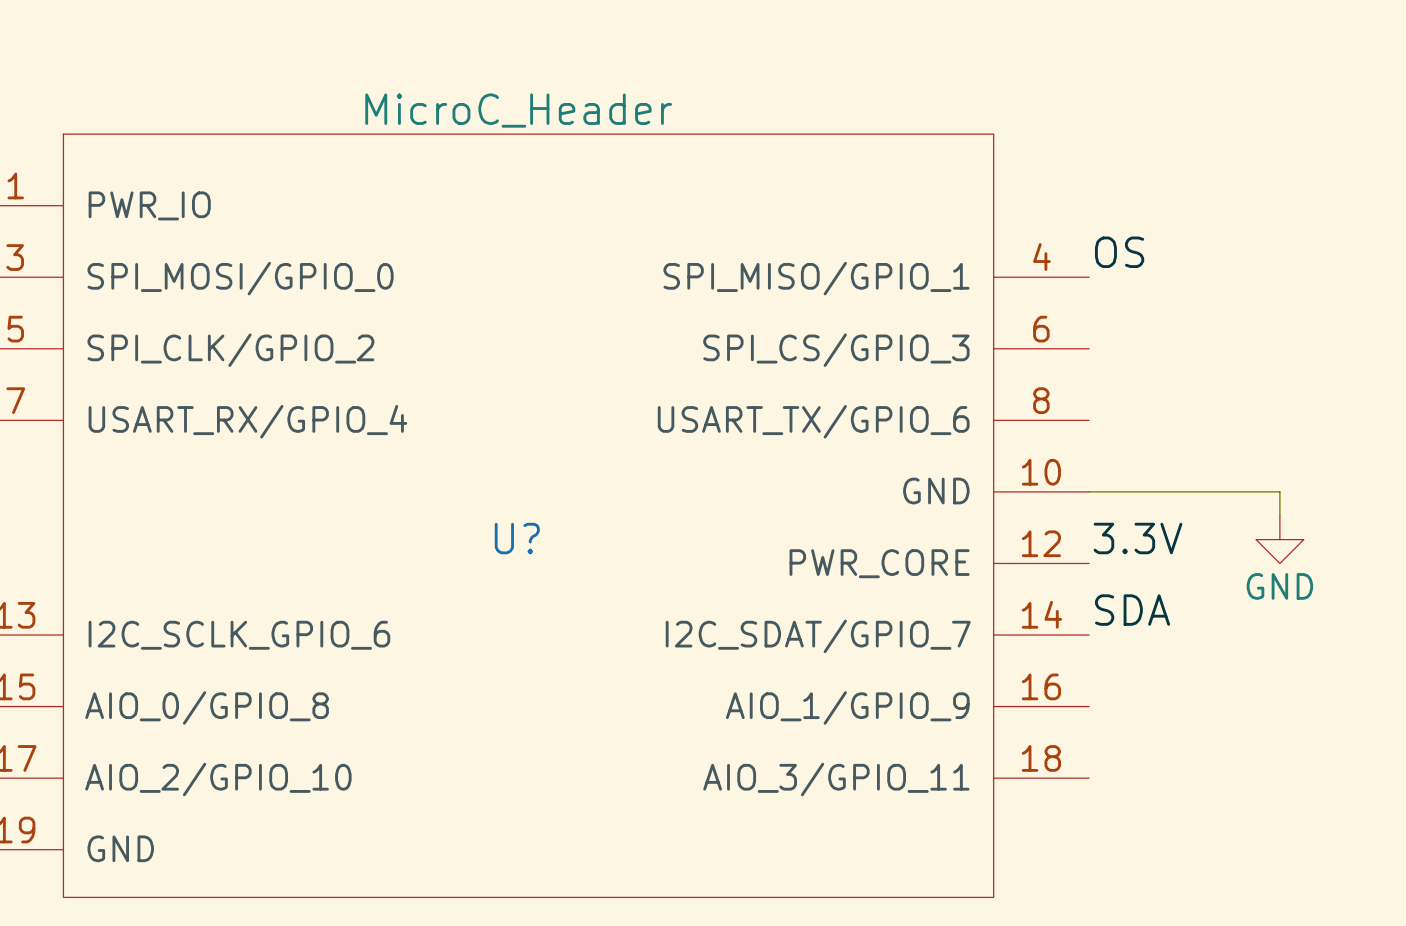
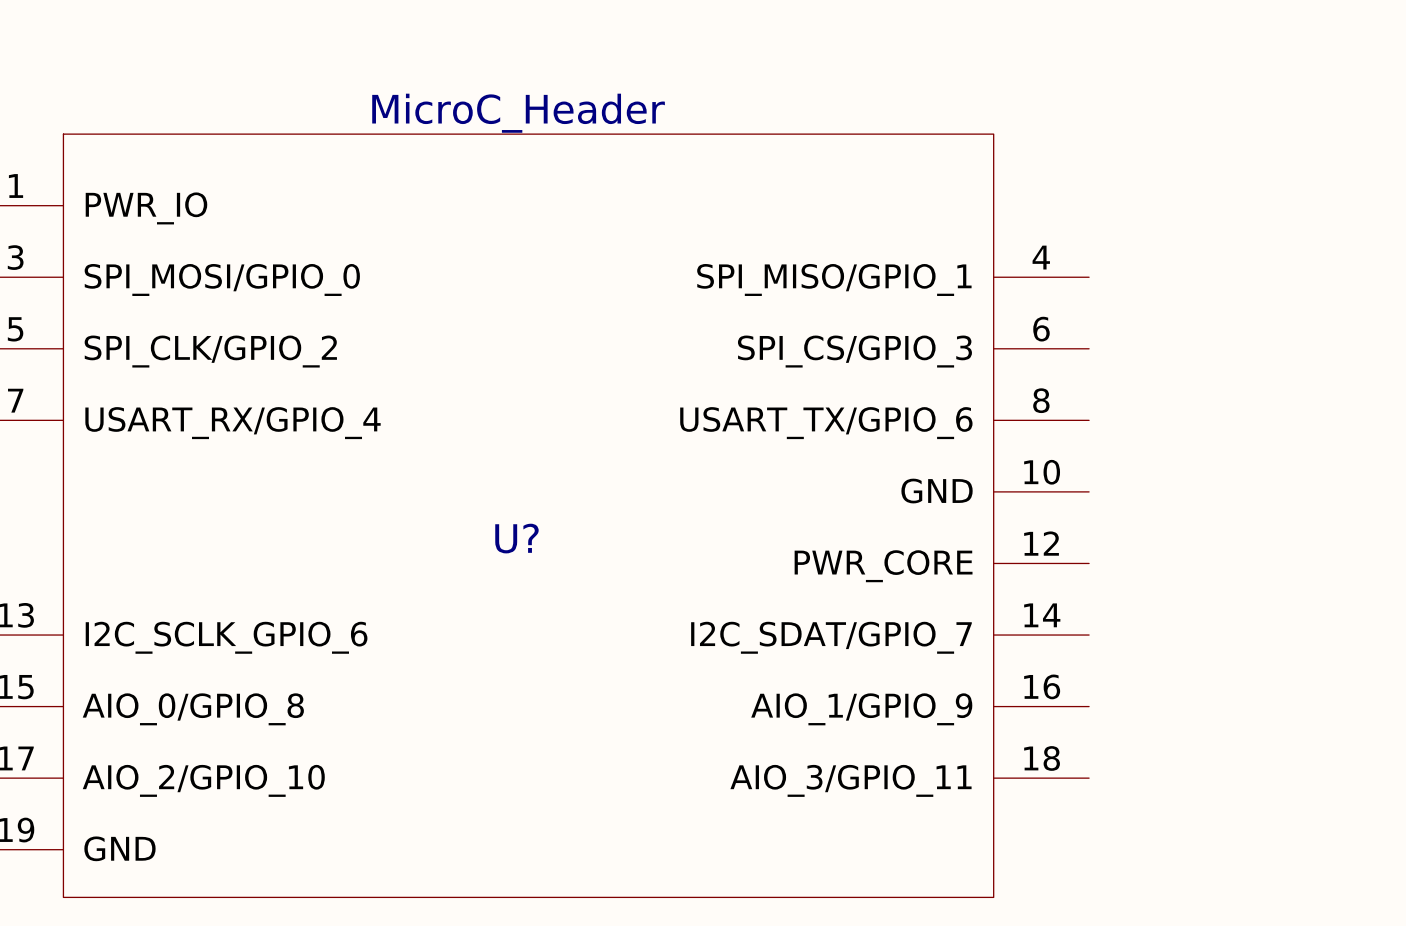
label: OS (1119, 252) -> none
wire: (1089, 491) (1279, 491) (1279, 515) -> none
label: 3.3V (1137, 538) -> none
power symbol: GND (1279, 539) -> none
label: SDA (1132, 610) -> none

